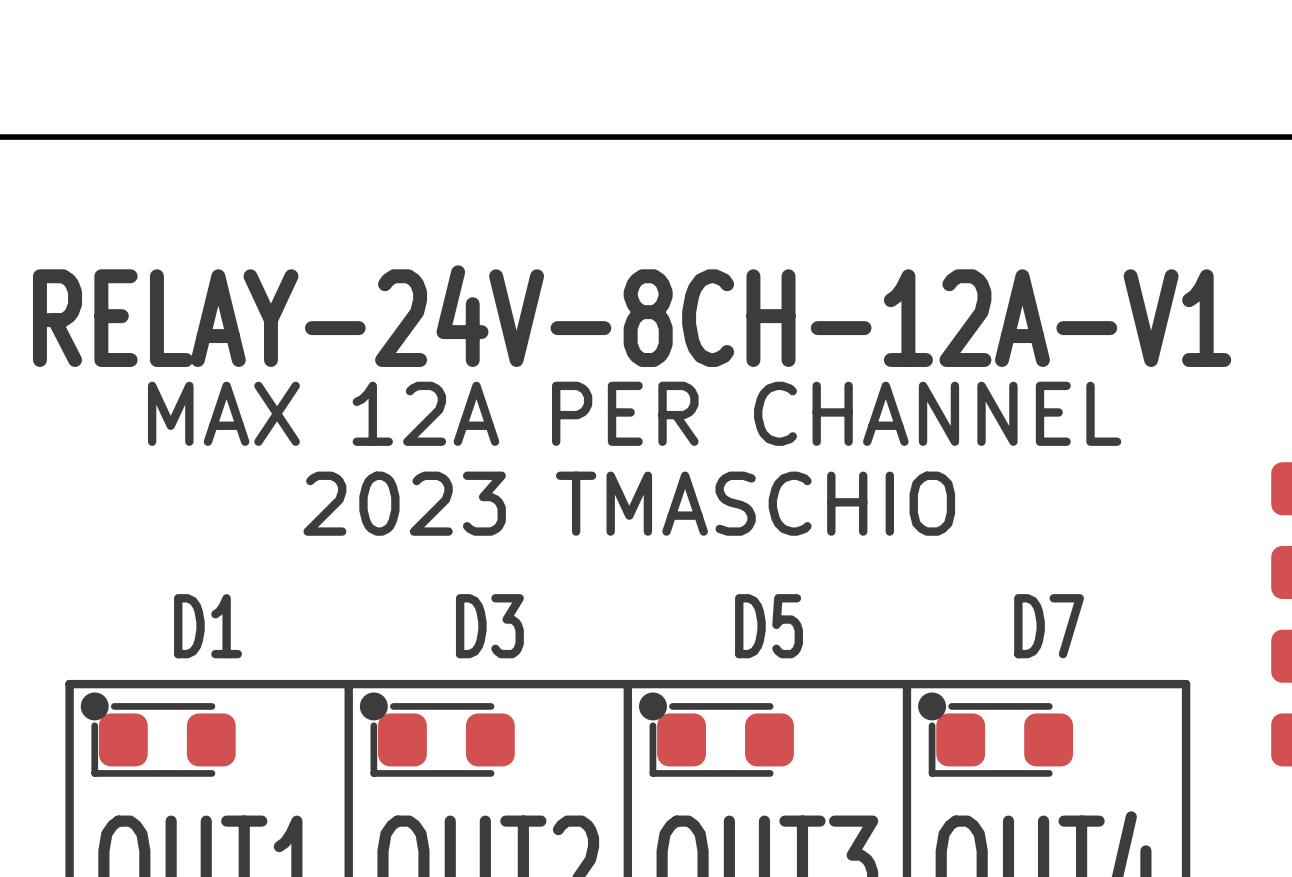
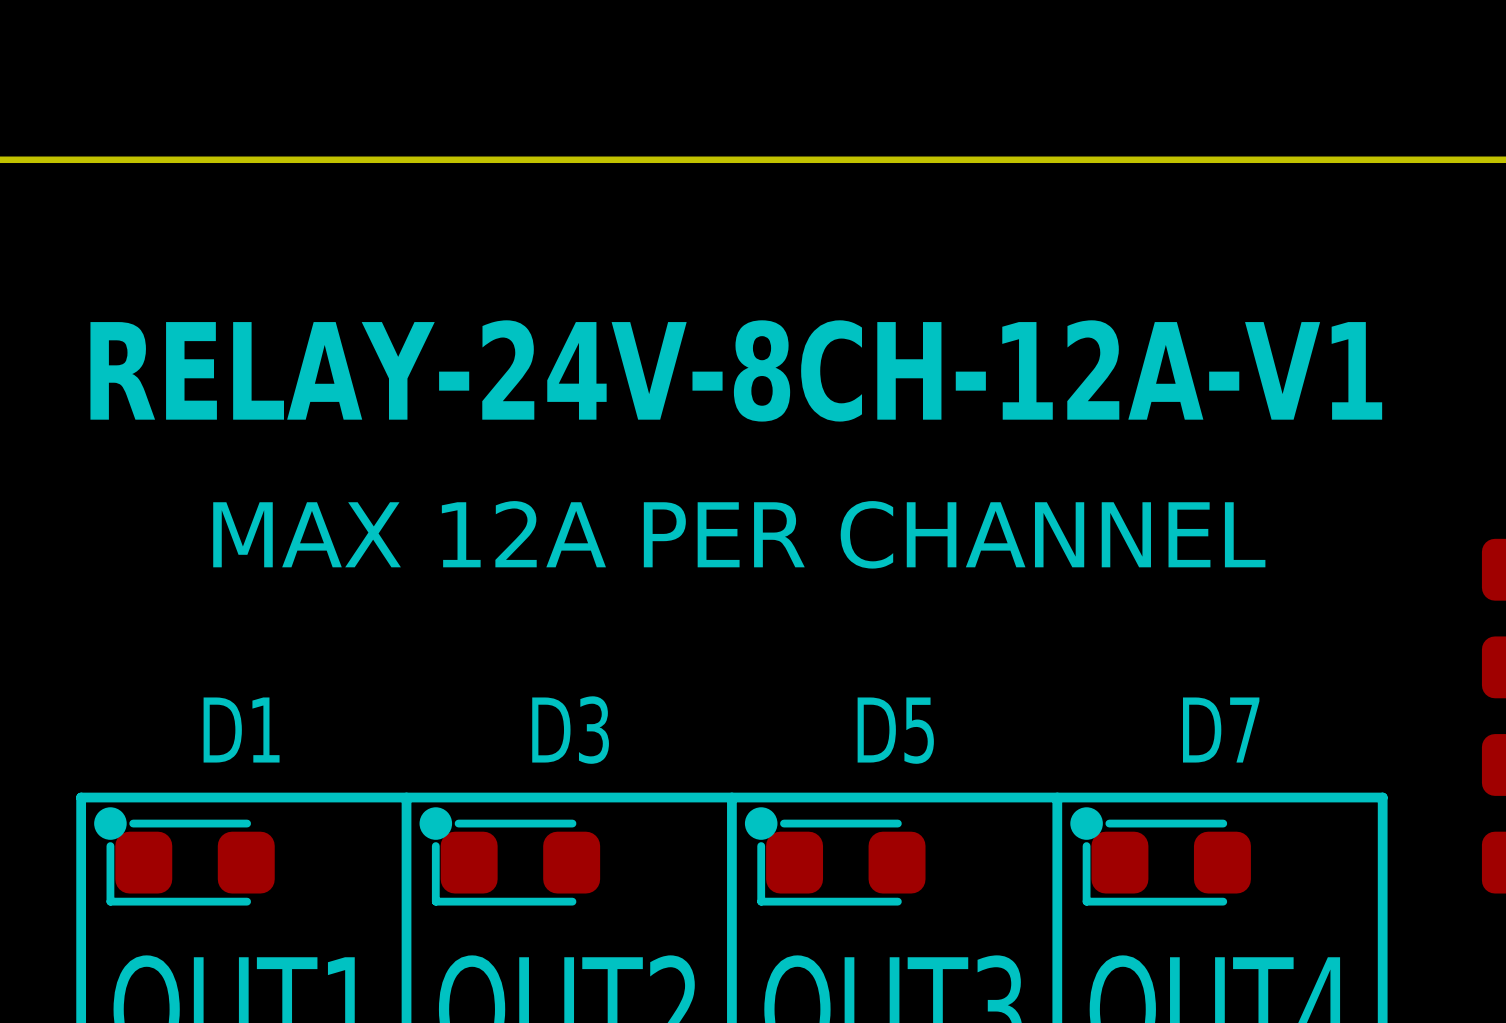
text position: MAX 12A PER CHANNEL (634, 413) -> MAX 12A PER CHANNEL (739, 534)
text: 2023 TMASCHIO (629, 503) -> none

